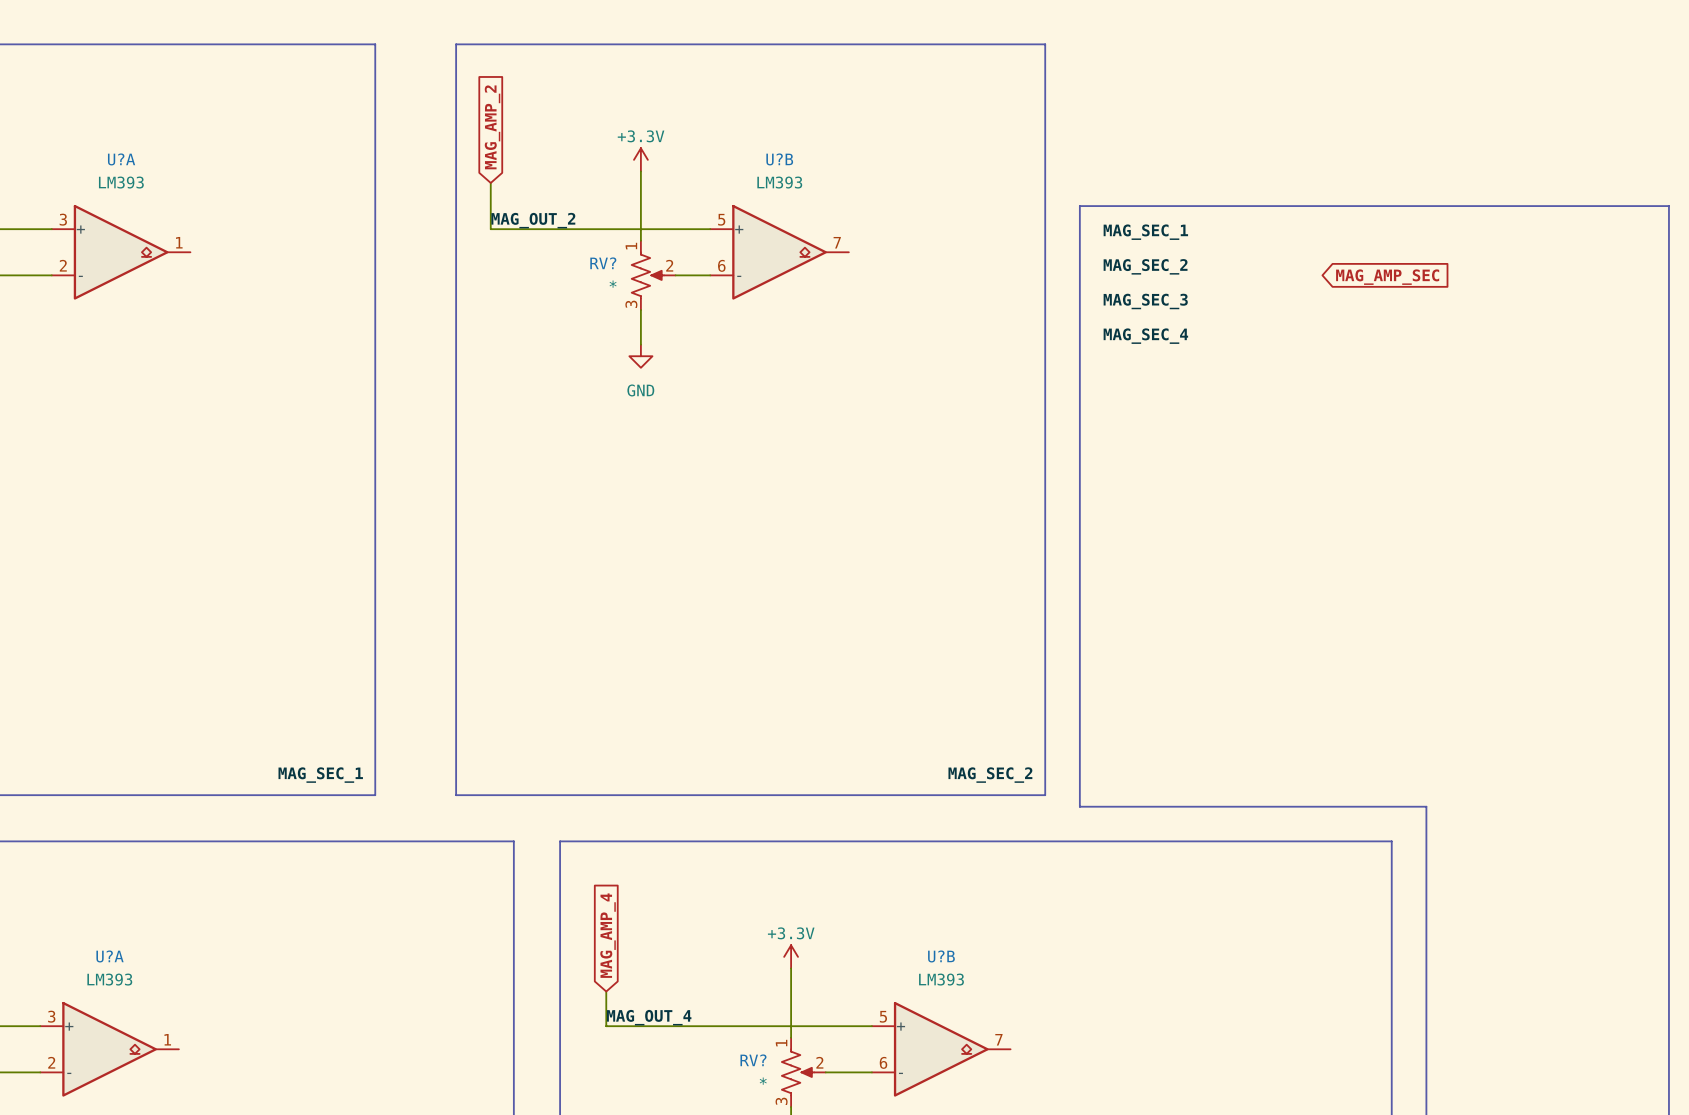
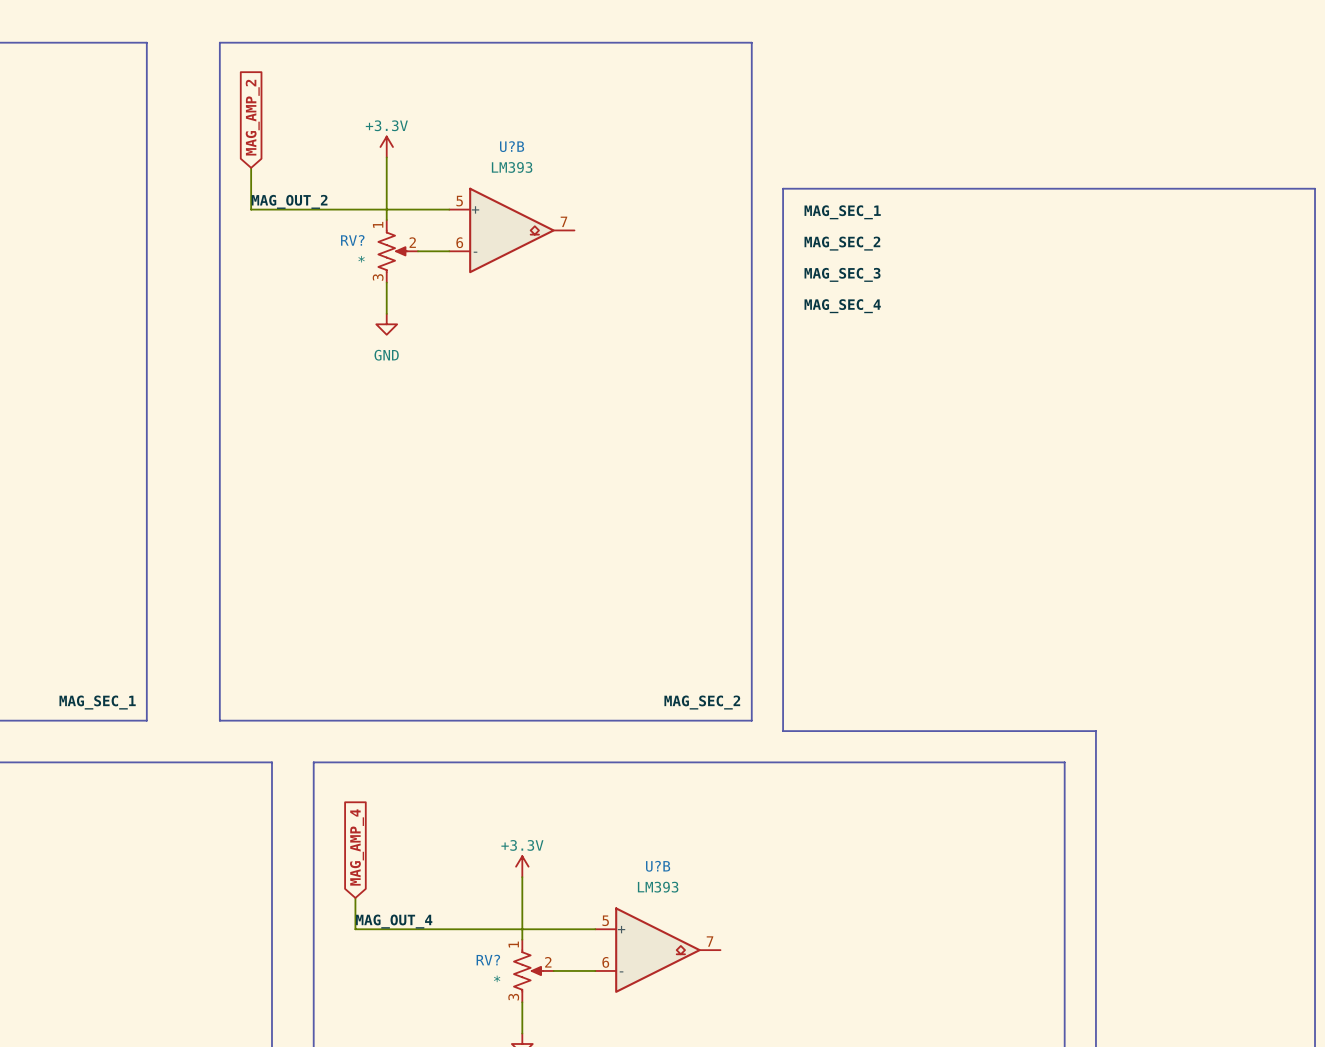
global label: MAG_AMP_SEC (1387, 277) -> none

